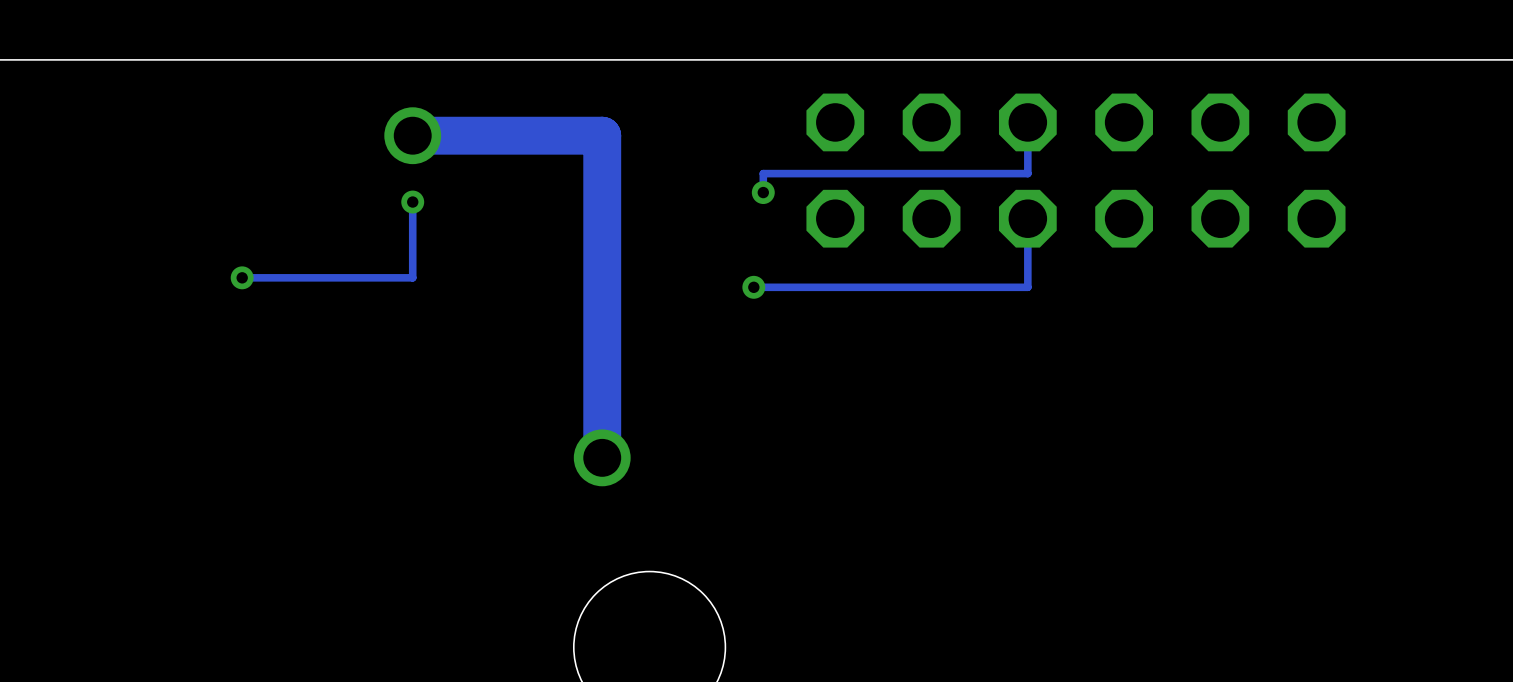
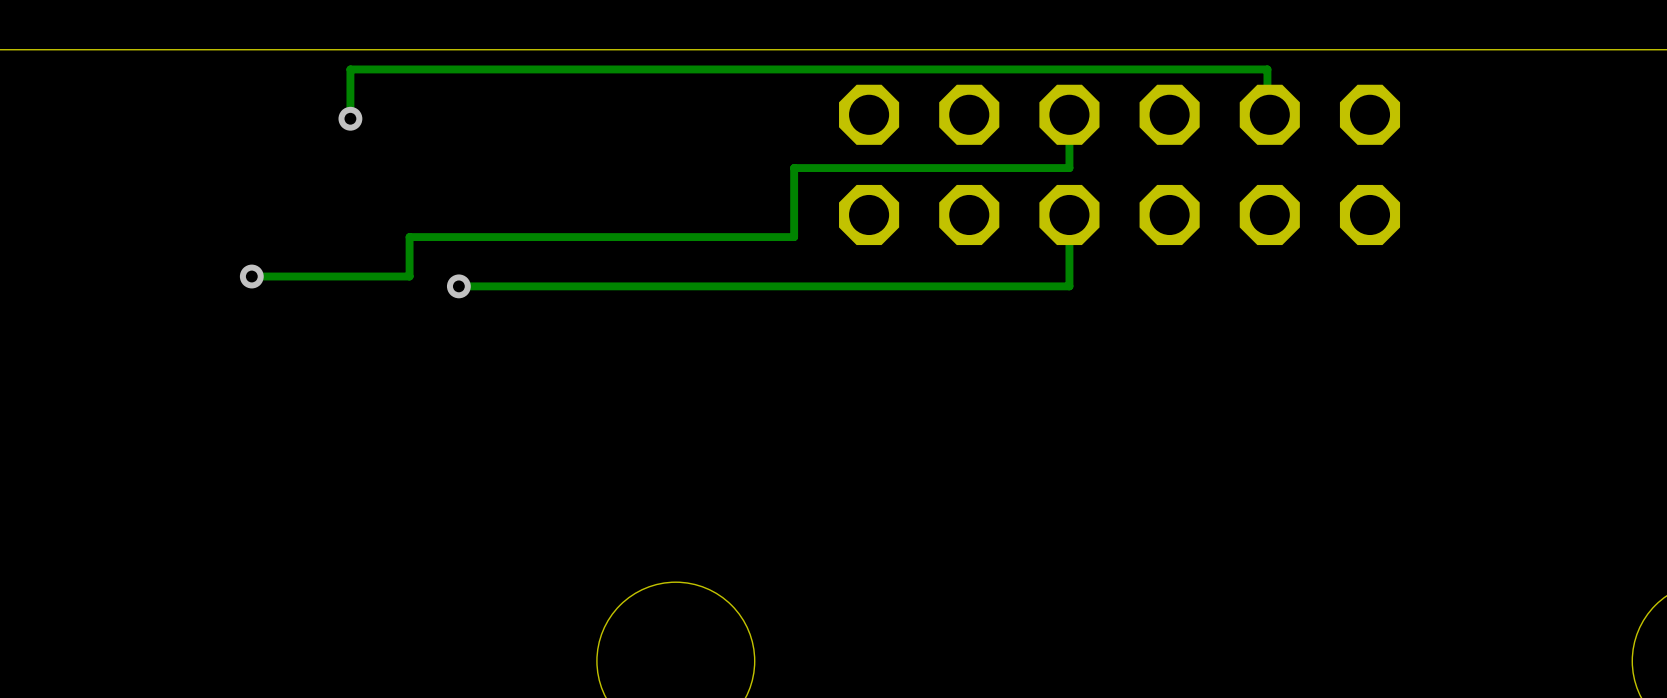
track: none -> (1267, 114) (1267, 69) (350, 69) (350, 118)
via: none -> (350, 118)
track: (412, 135) (602, 135) (602, 457) -> none
via: (412, 135) -> none
via: (763, 192) -> none
track: (412, 202) (412, 277) (393, 277) -> (794, 187) (794, 237) (409, 237) (409, 276)
via: (412, 202) -> none
via: none -> (458, 286)
track: none -> (784, 286) (458, 286)
via: (753, 287) -> none
via: (602, 457) -> none

